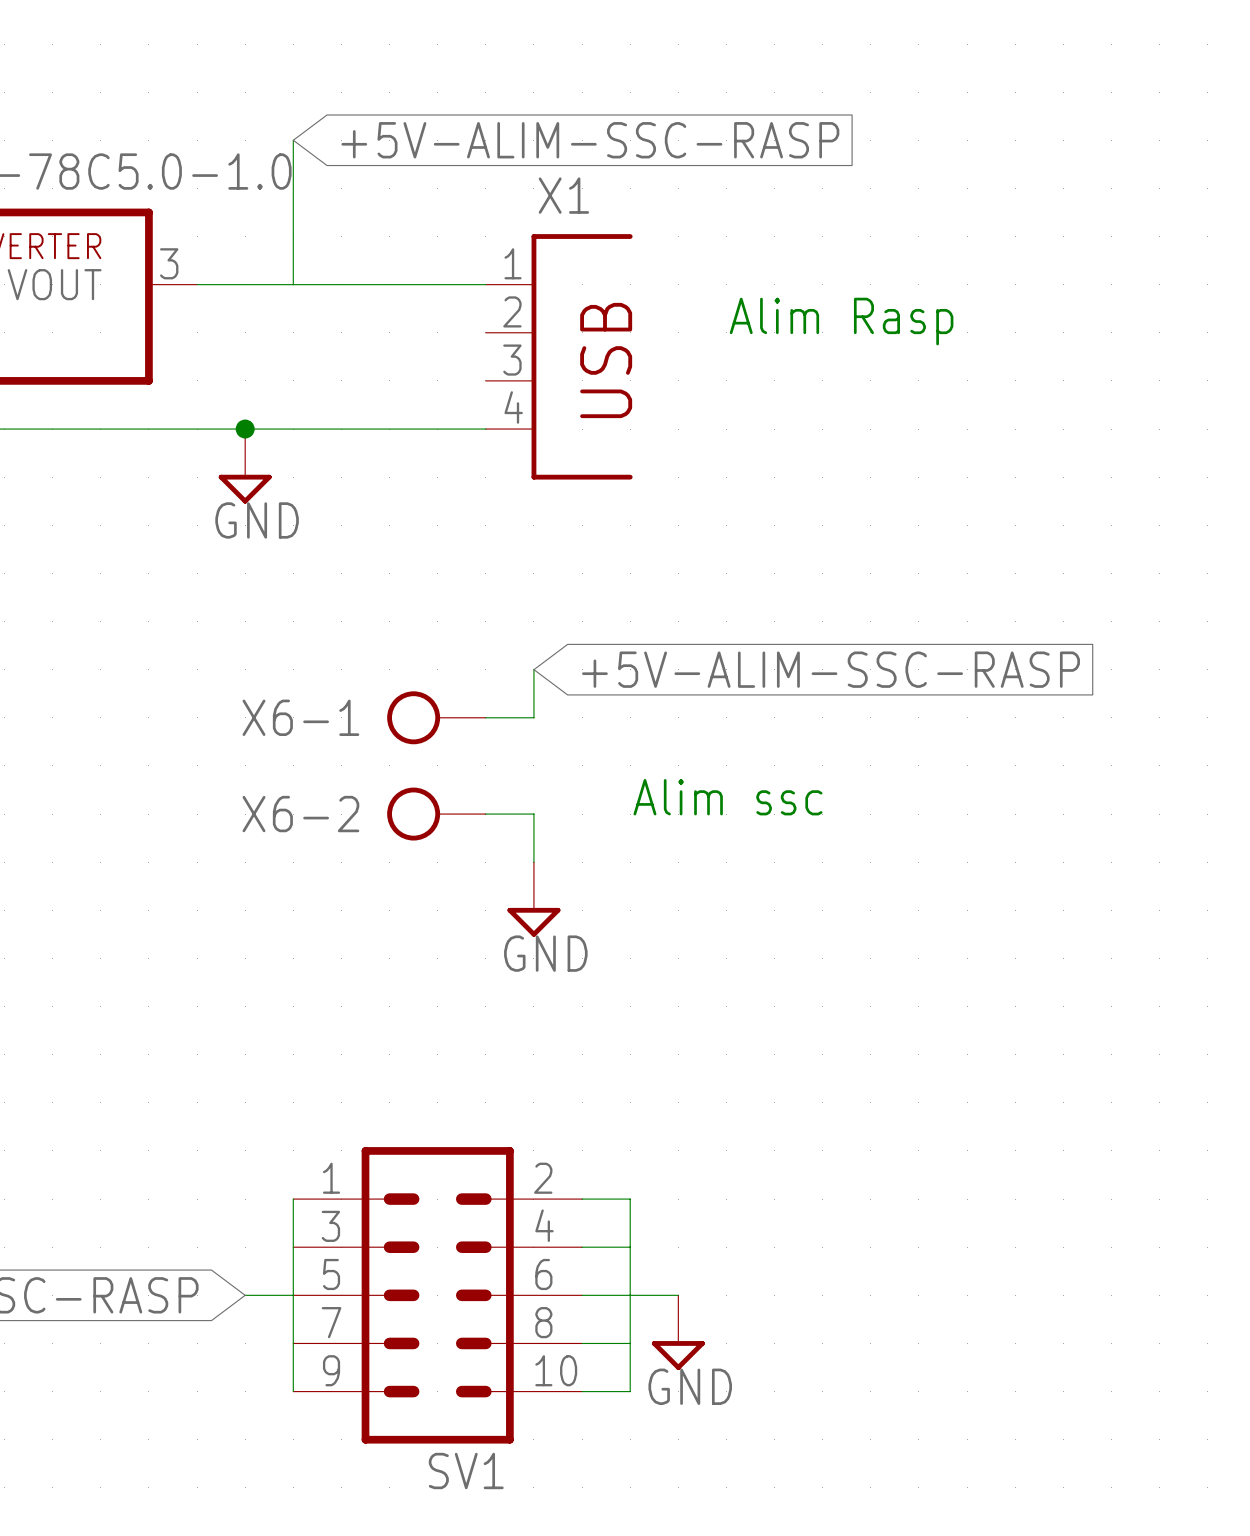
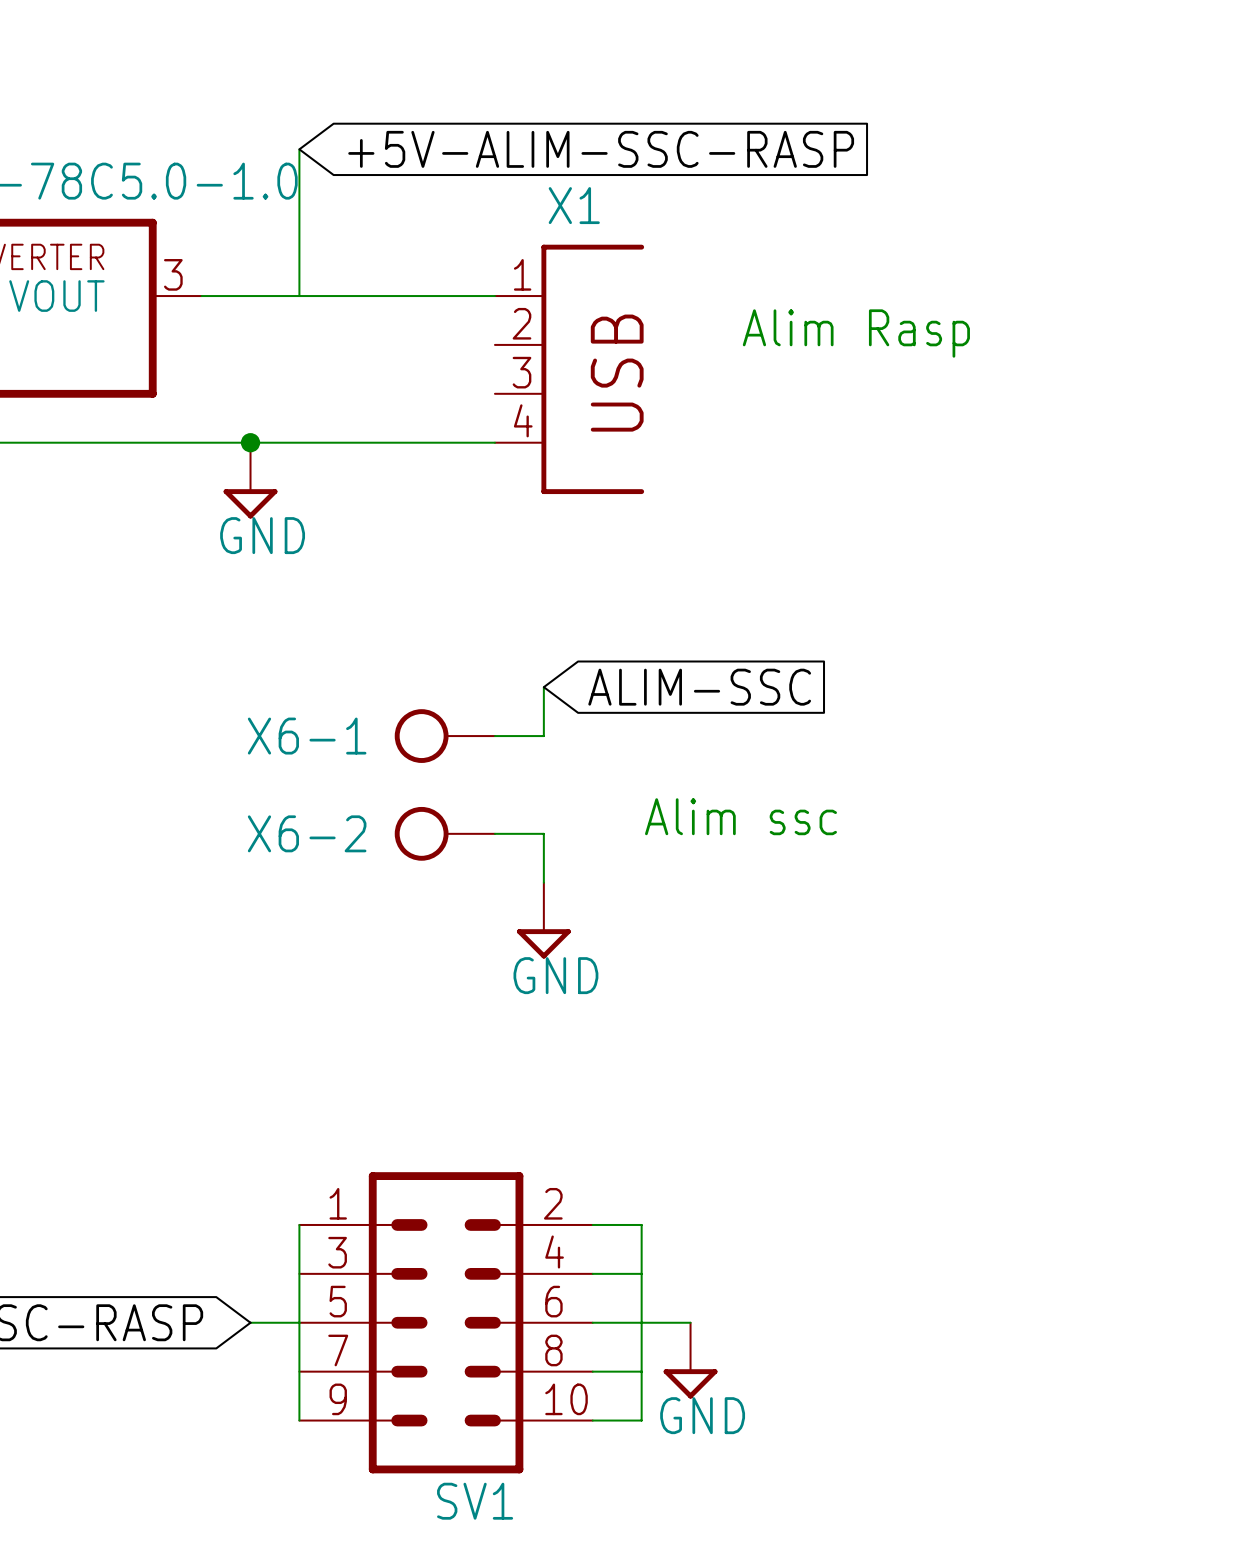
global label: +5V-ALIM-SSC-RASP (830, 669) -> ALIM-SSC (699, 687)

